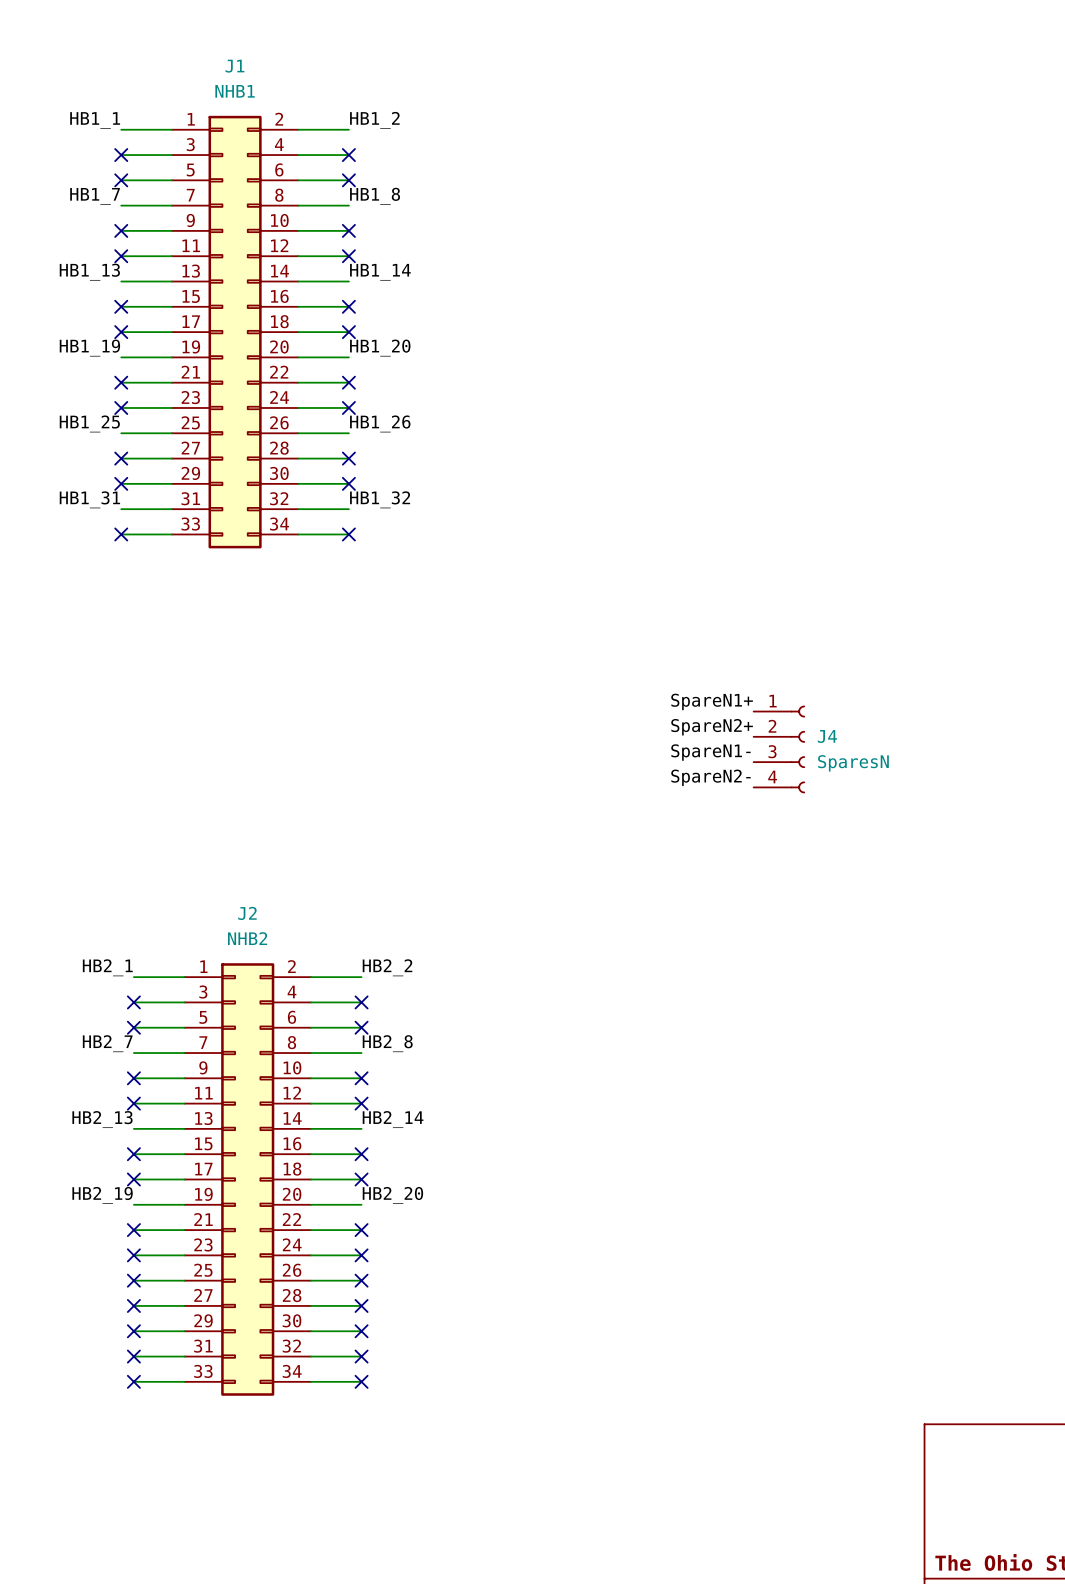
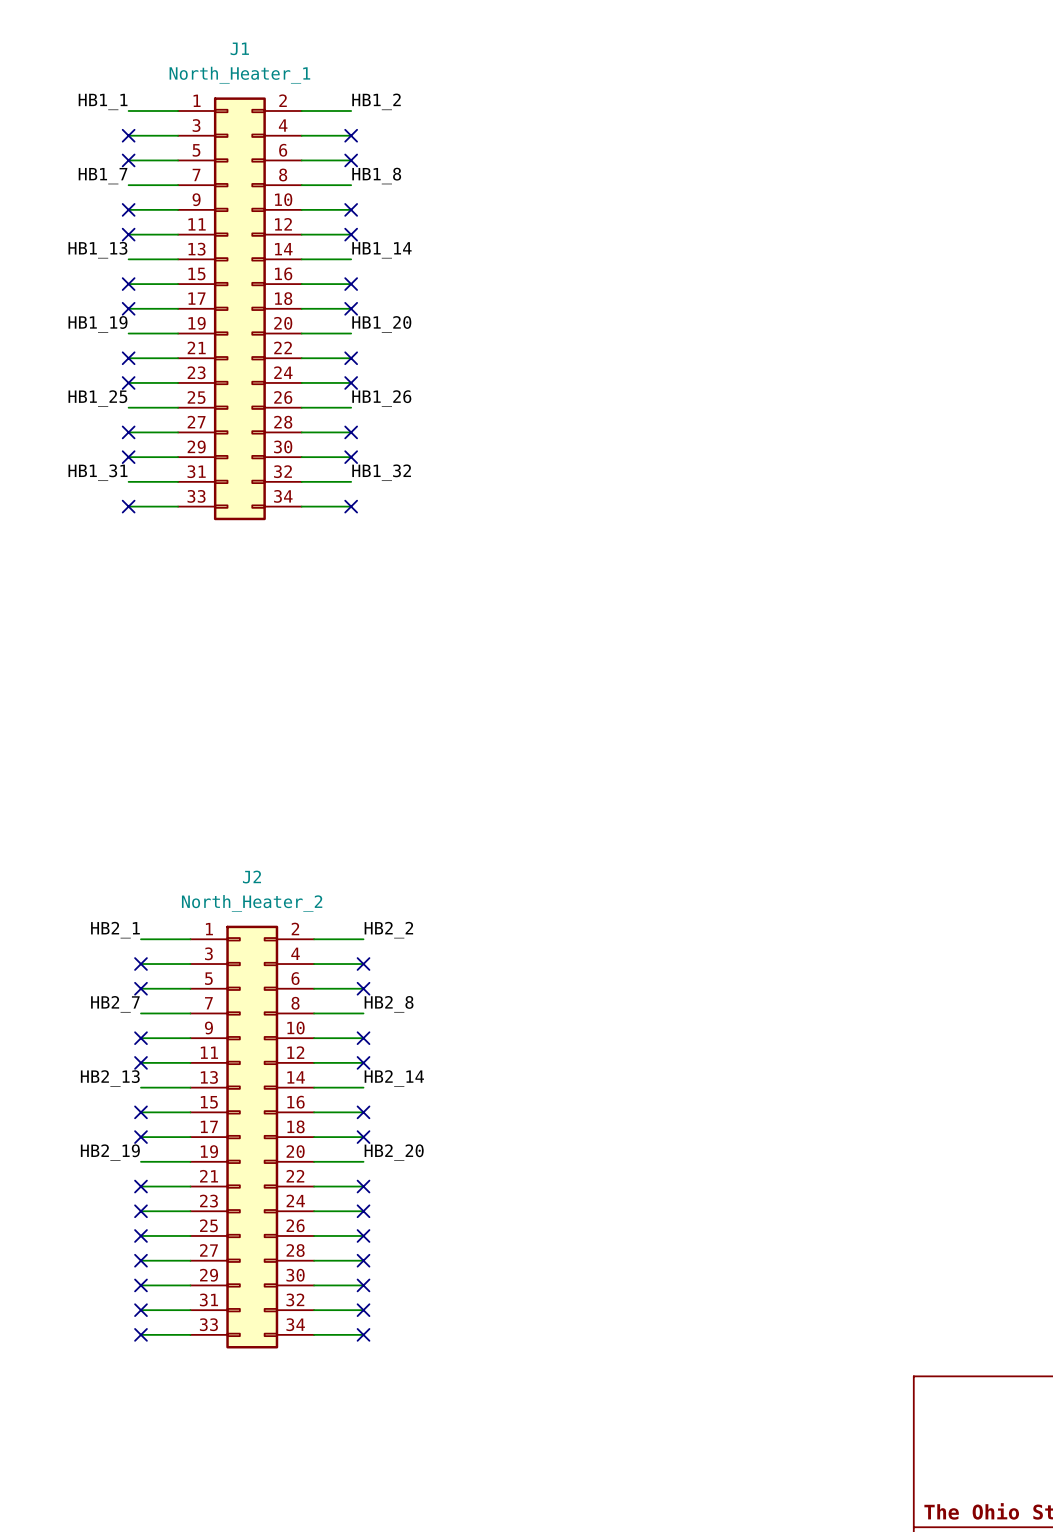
J1 value: NHB1 (235, 91) -> North_Heater_1 (239, 75)
label: SpareN1+ (712, 701) -> none
label: SpareN2+ (712, 727) -> none
J4: SparesN (779, 749) -> none
label: SpareN1- (710, 752) -> none
label: SpareN2- (710, 777) -> none
J2 value: NHB2 (247, 938) -> North_Heater_2 (252, 903)

